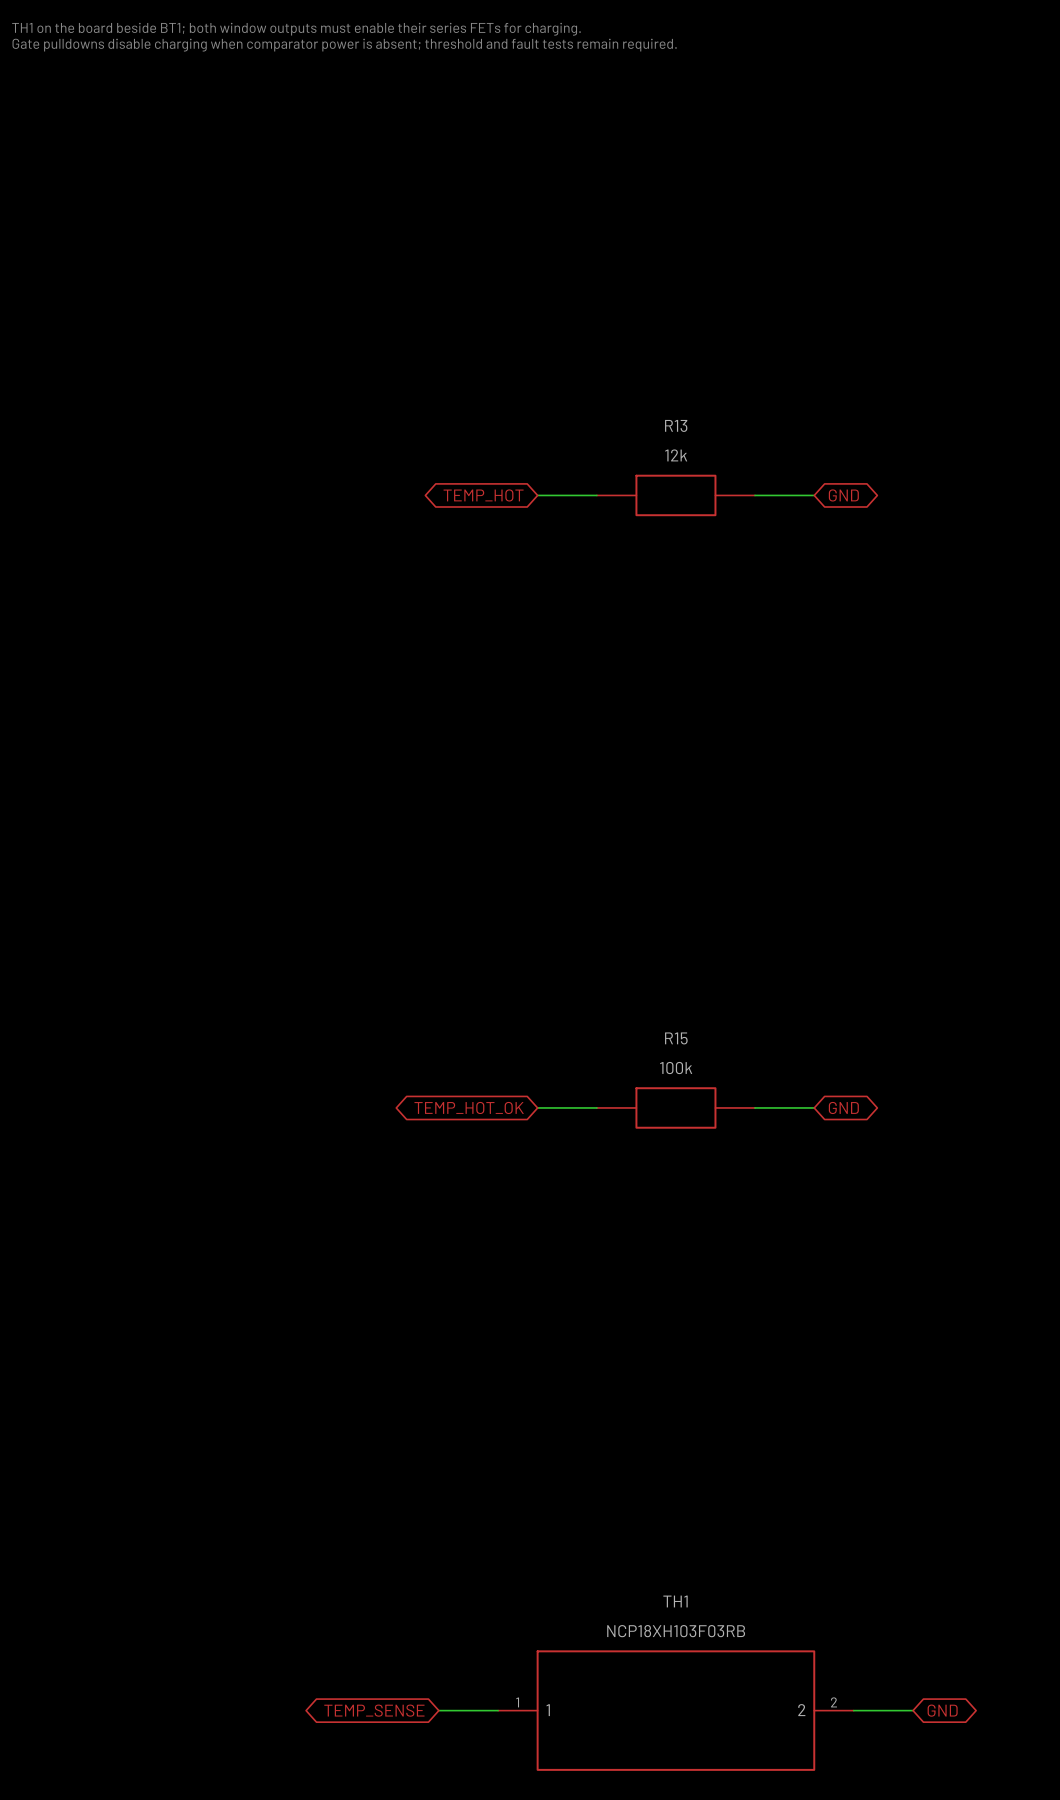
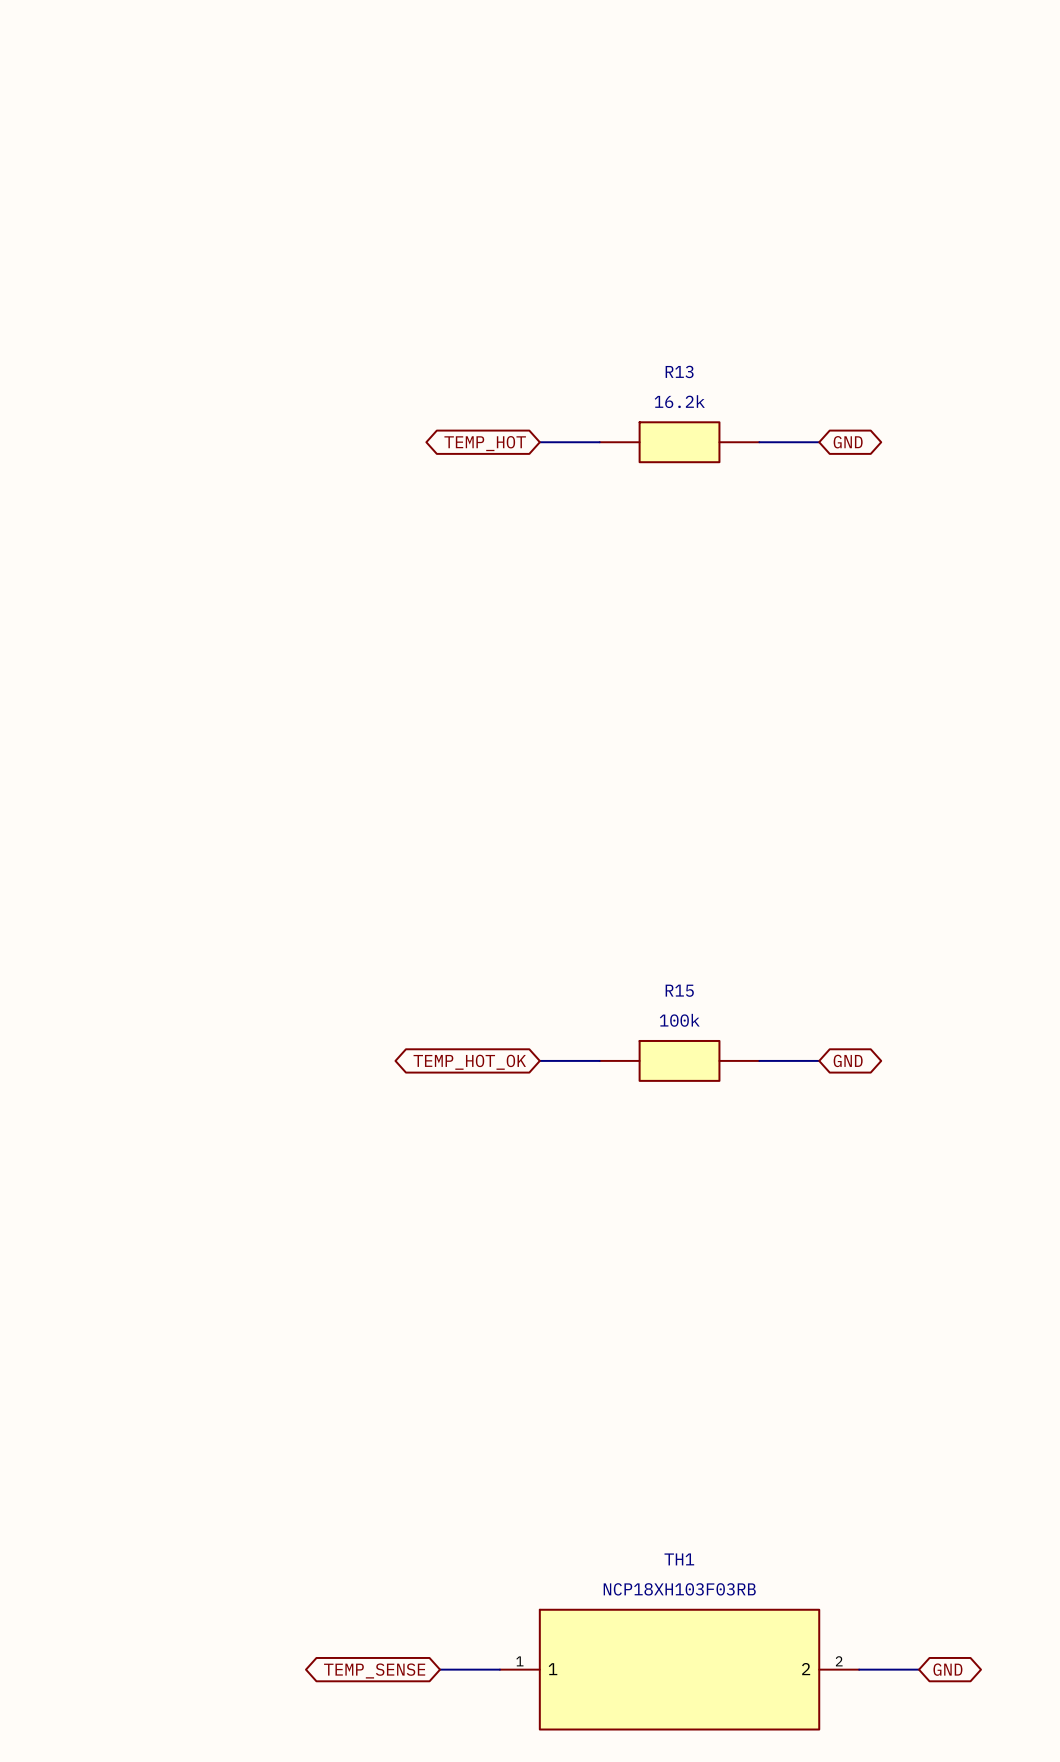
R13 value: 12k (676, 455) -> 16.2k (679, 401)

